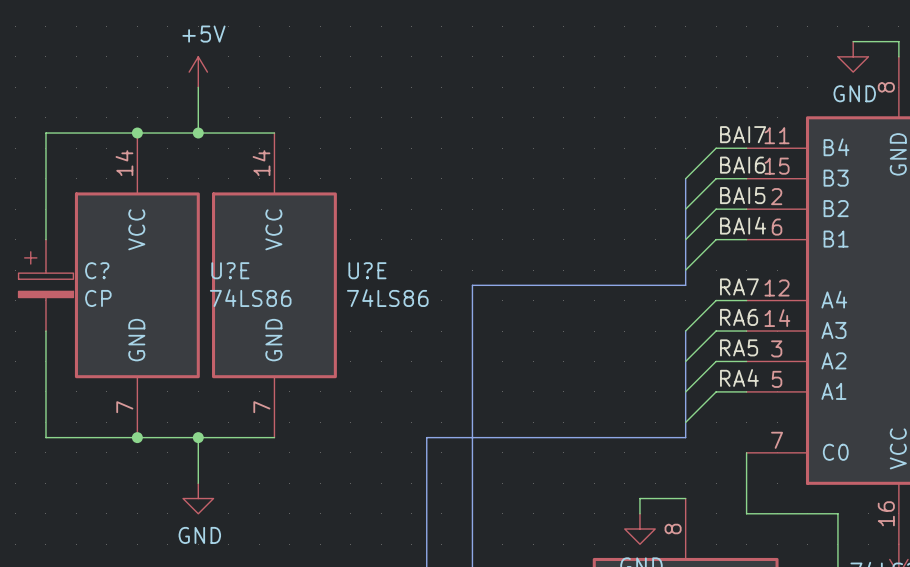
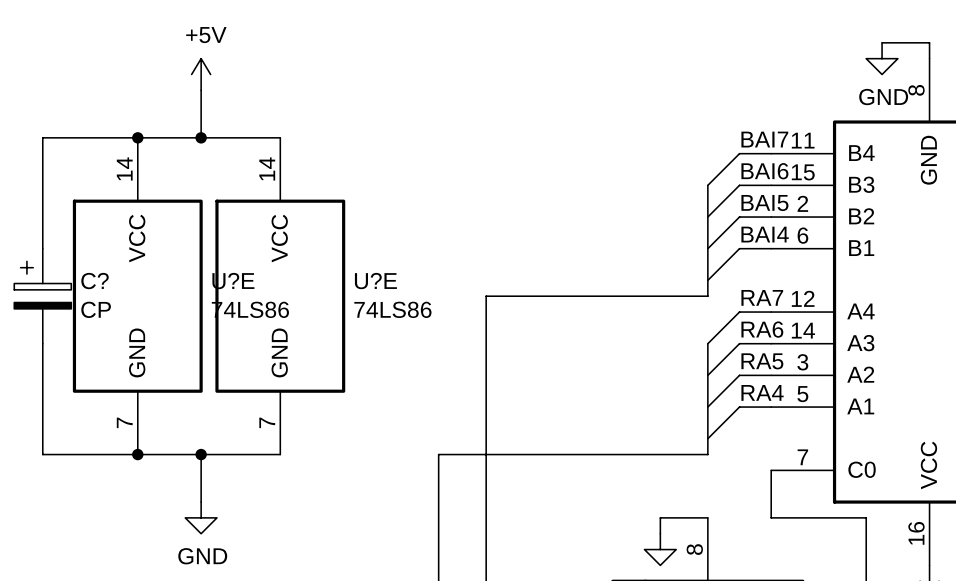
wire: (746, 498) (746, 513) (837, 513) -> (771, 517) (866, 517) (866, 533)

